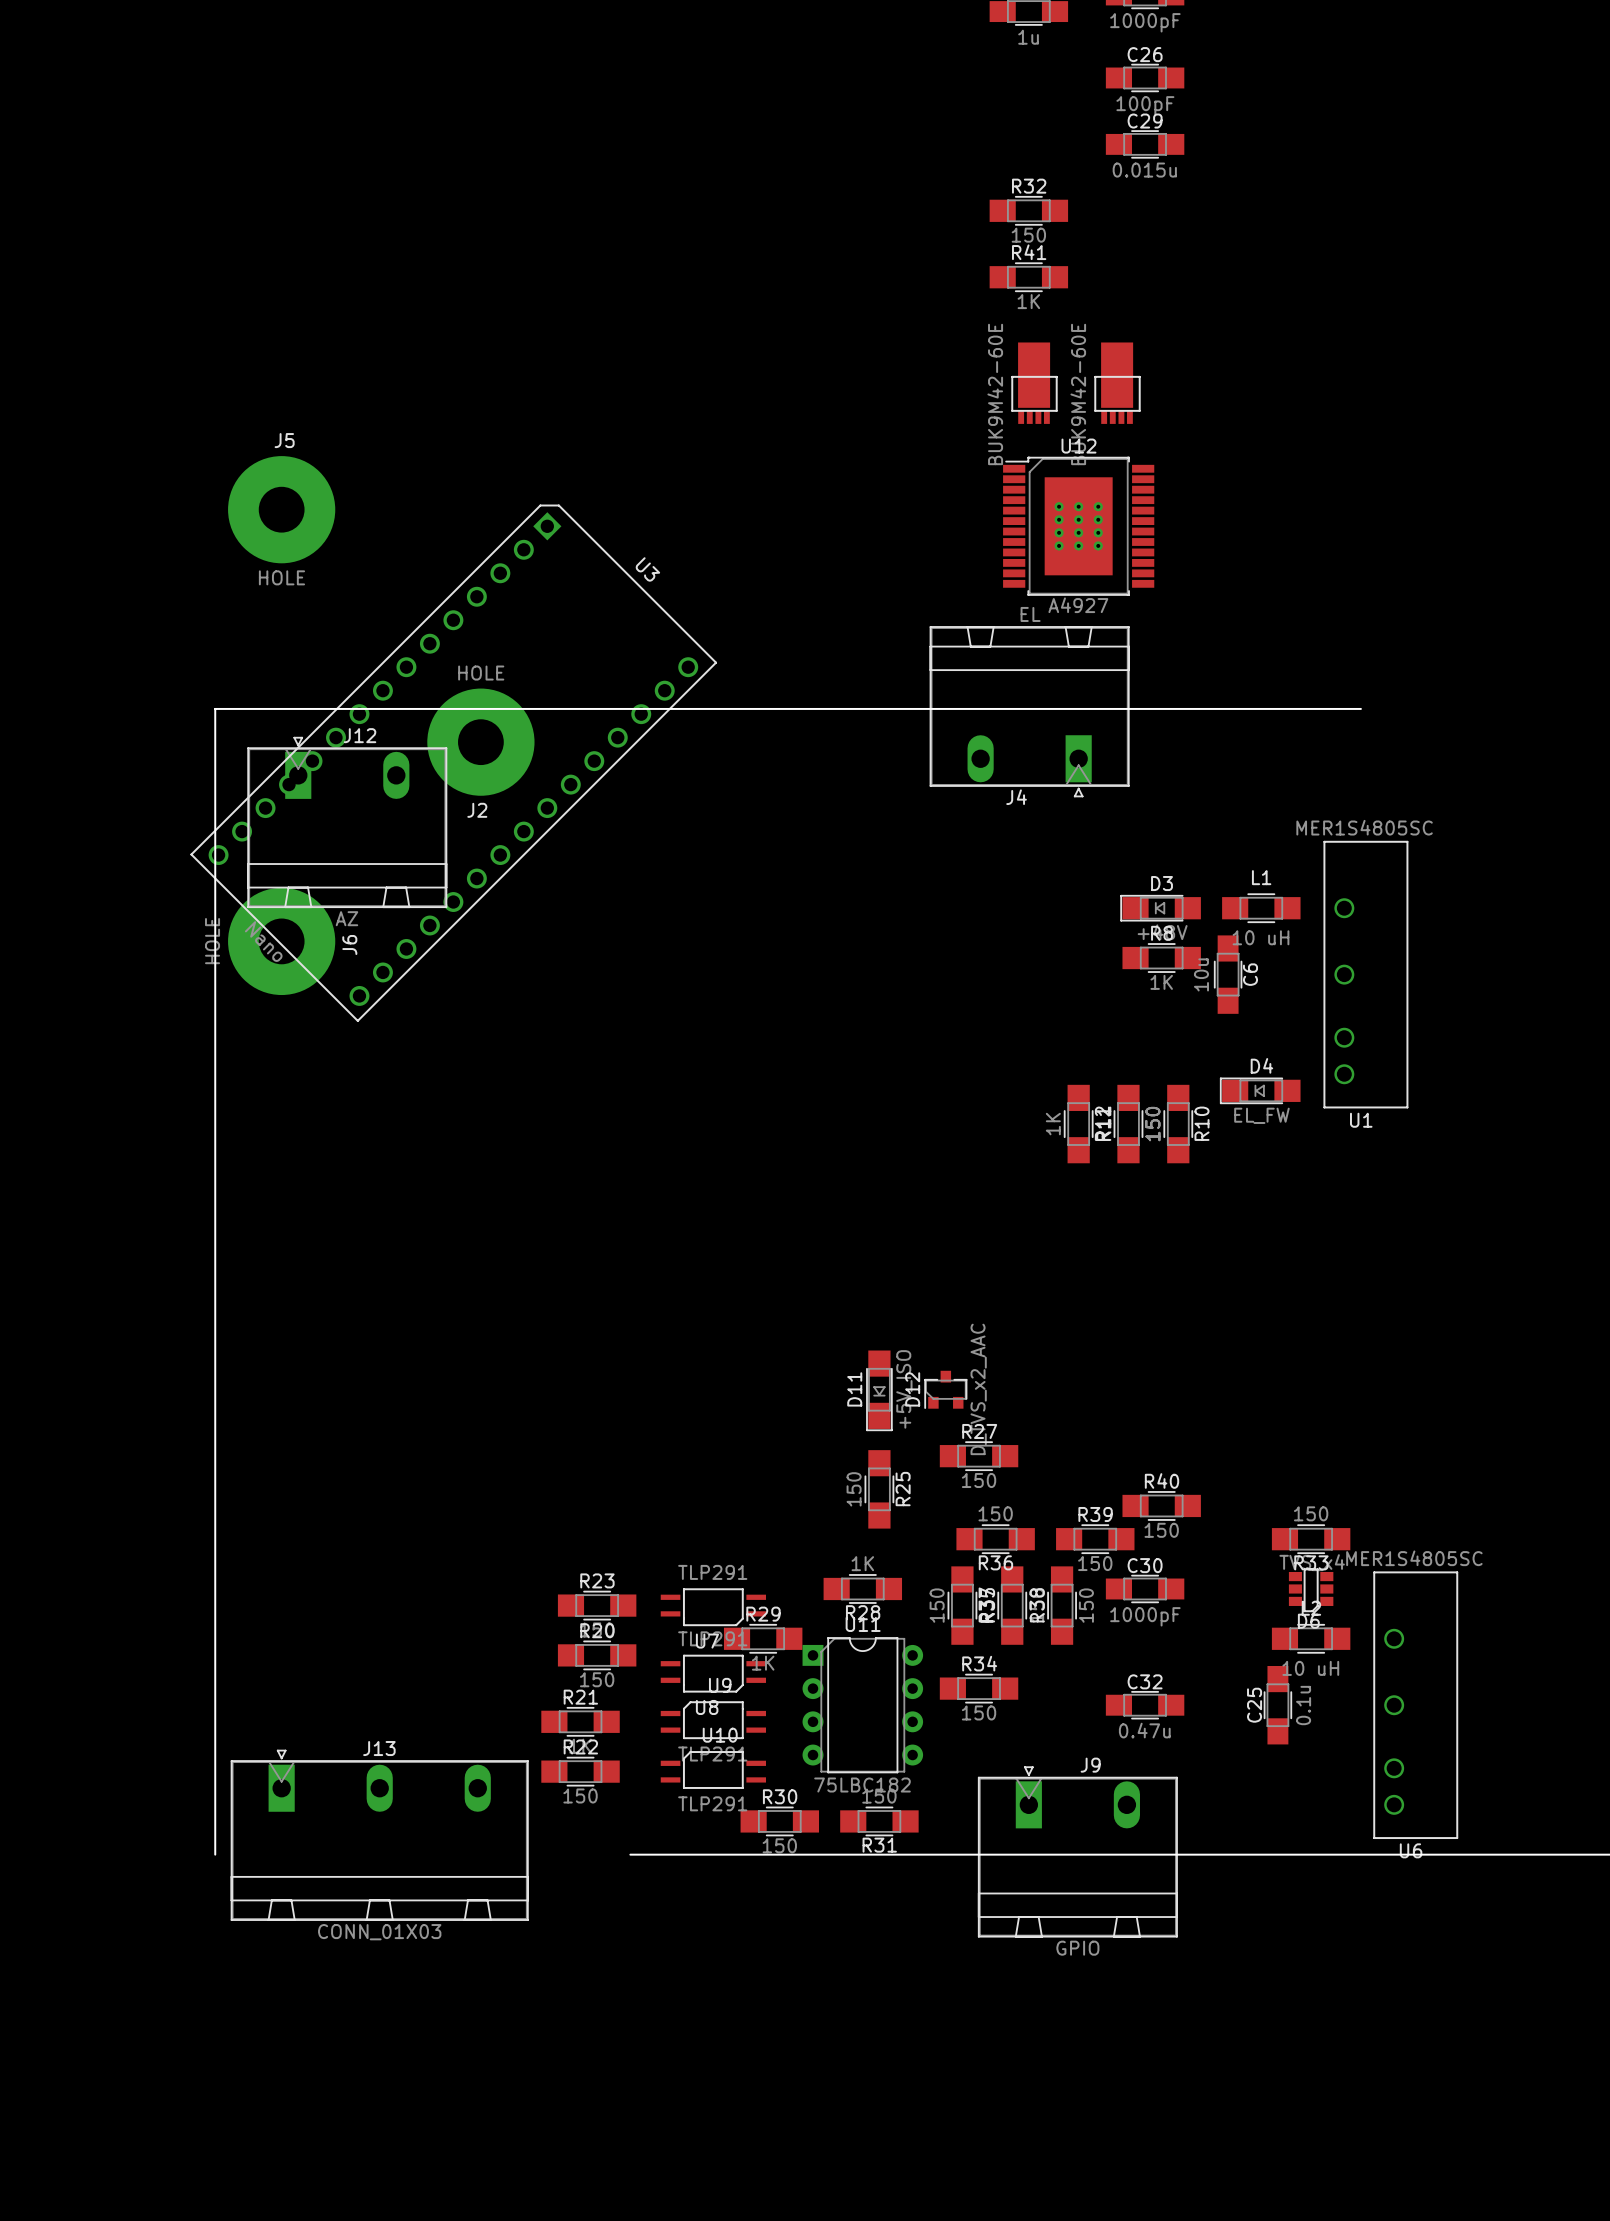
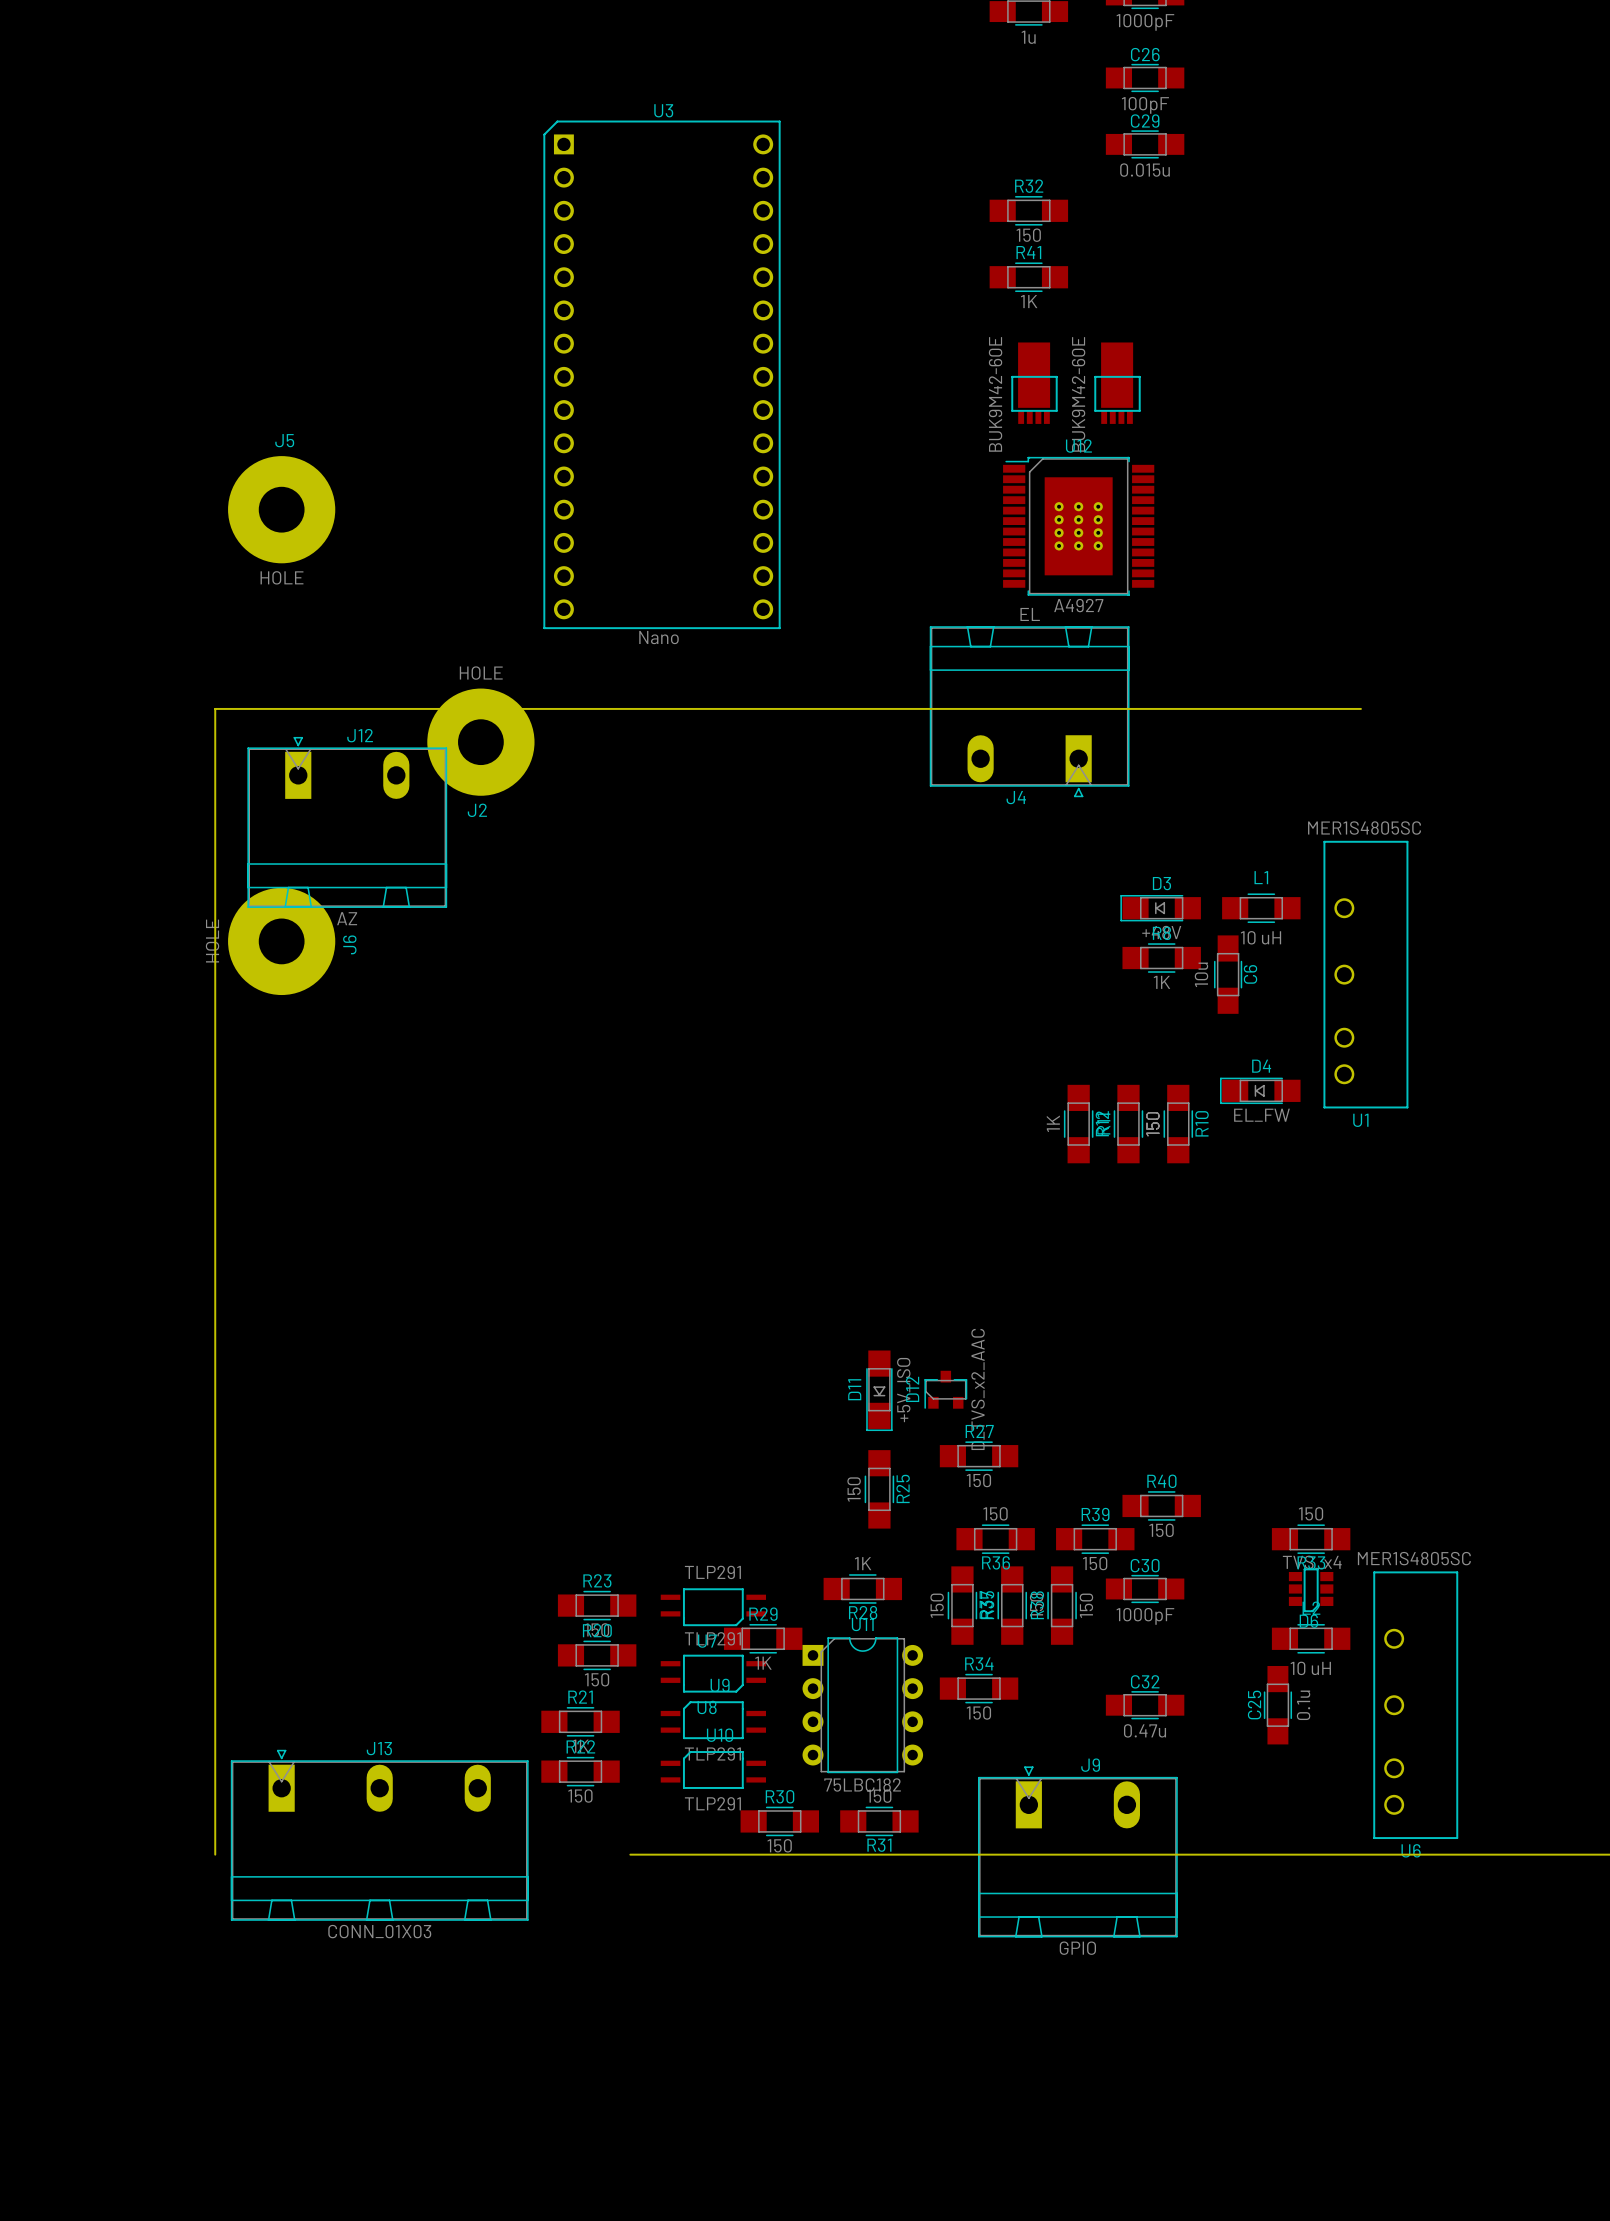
U3 rotation: 0° (453, 763) -> 45° counterclockwise (661, 374)
U3 position: (453, 763) -> (661, 374)

